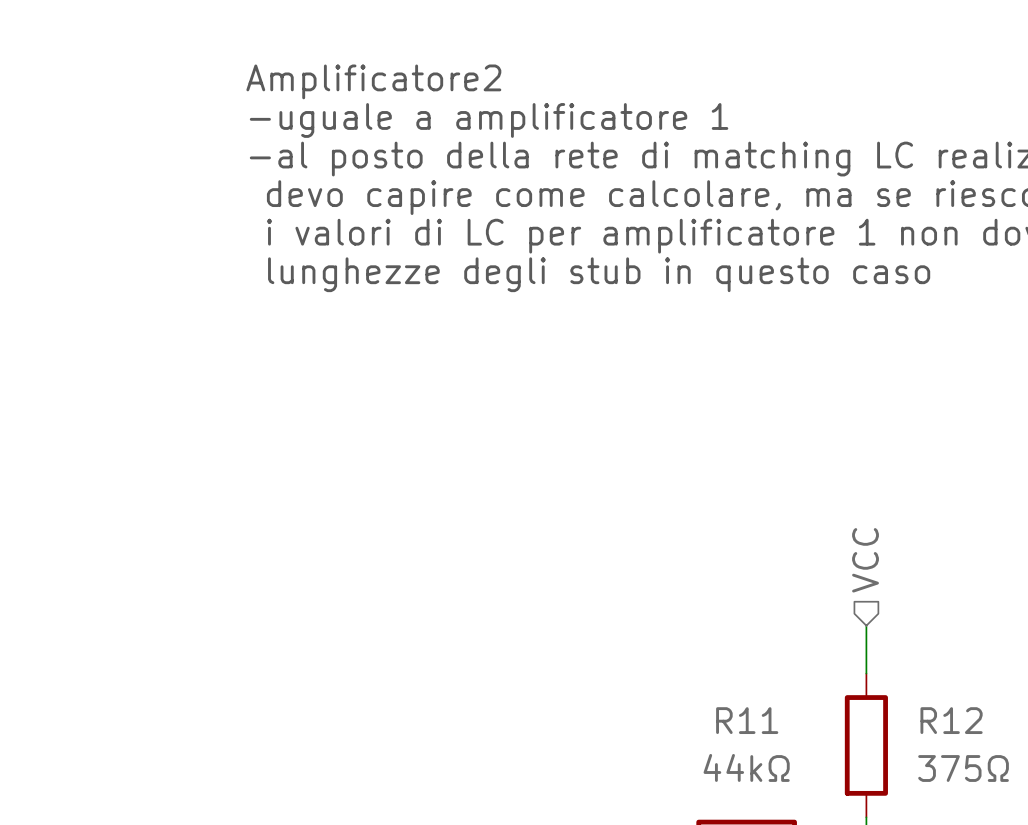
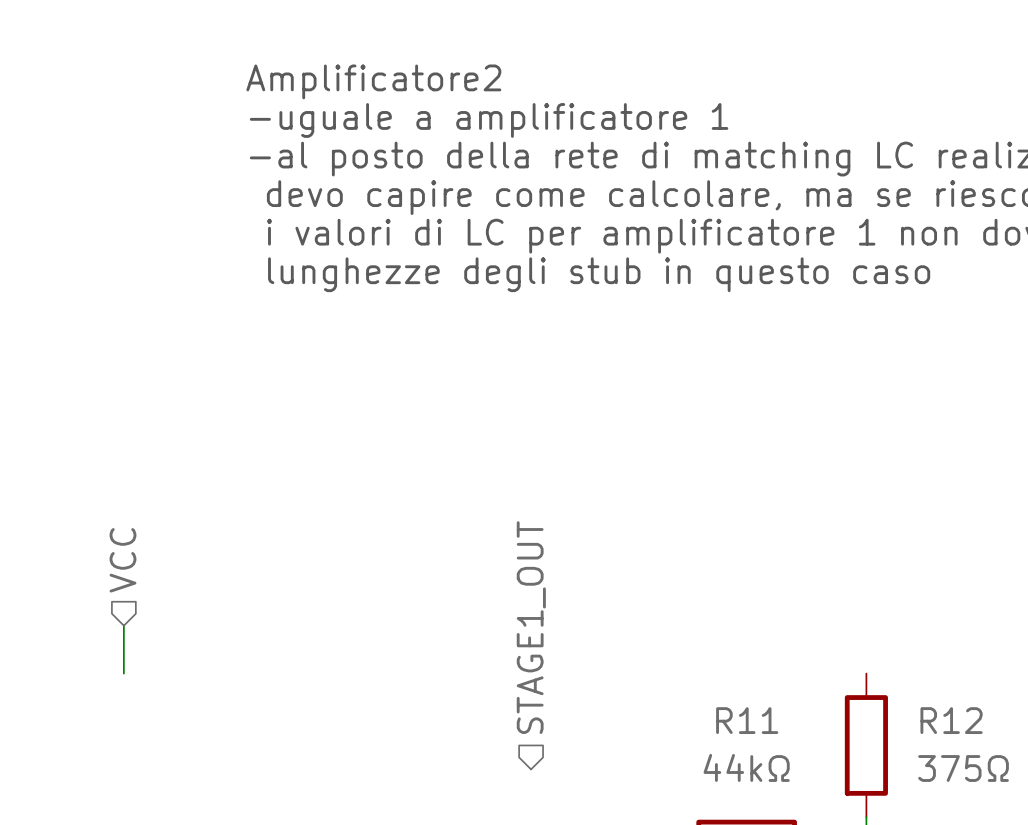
hierarchical label: none -> VCC (122, 560)
hierarchical label: VCC (865, 560) -> none
wire: none -> (123, 625) (123, 673)
wire: (866, 625) (866, 673) -> none
hierarchical label: none -> STAGE1_OUT (531, 627)

